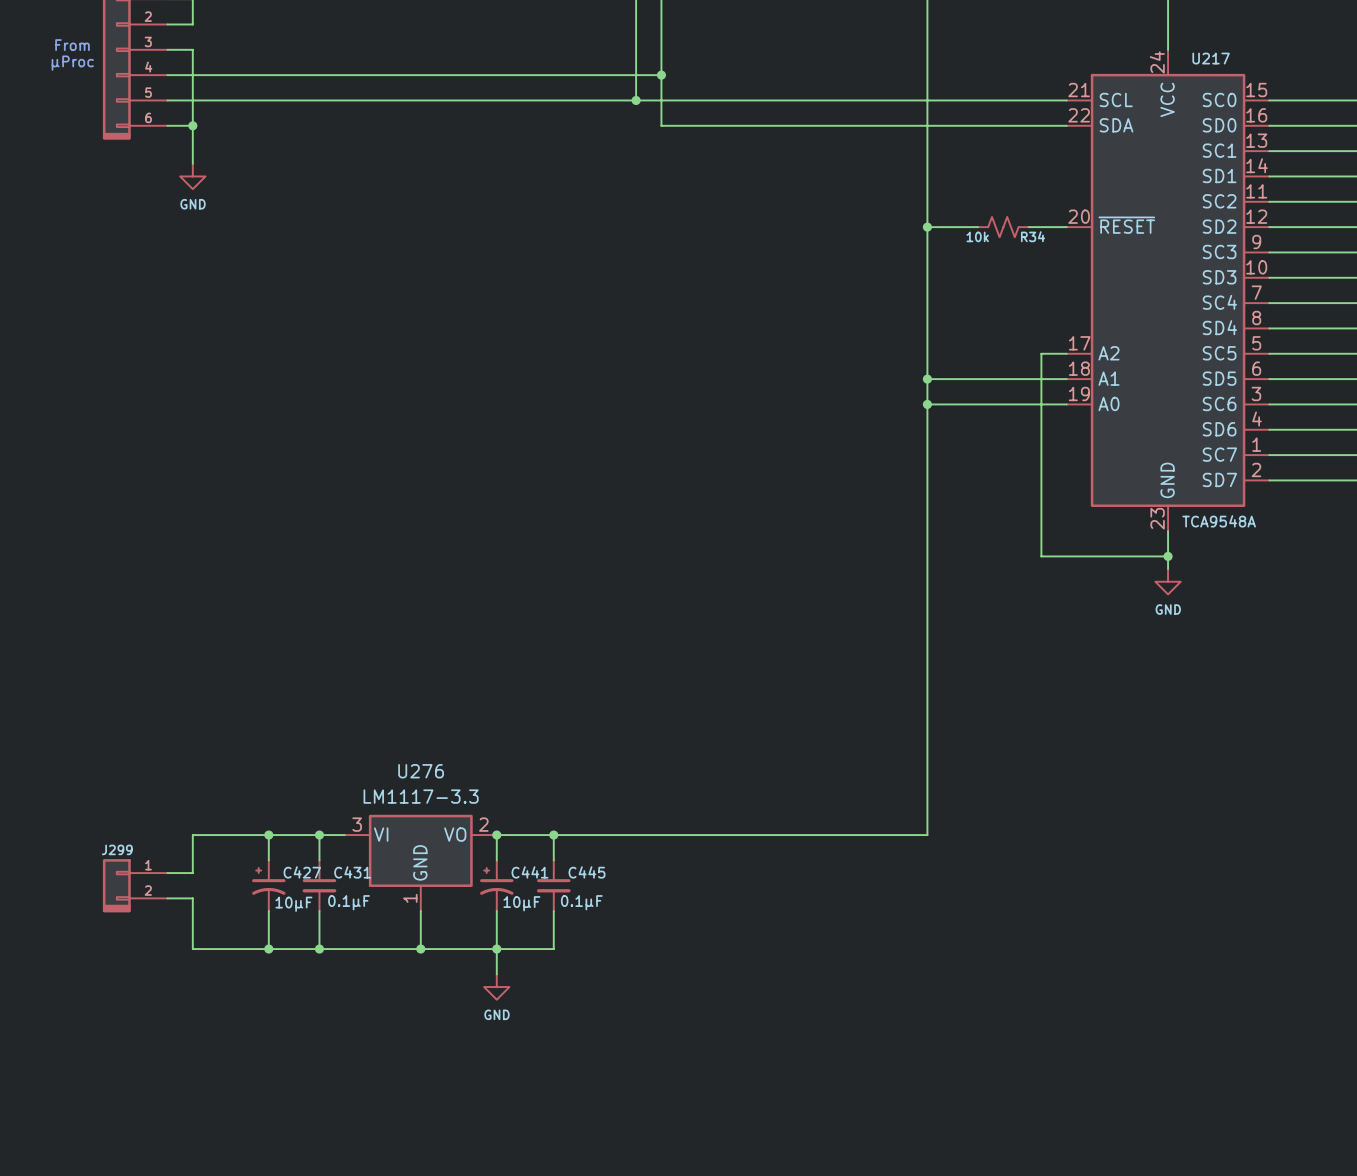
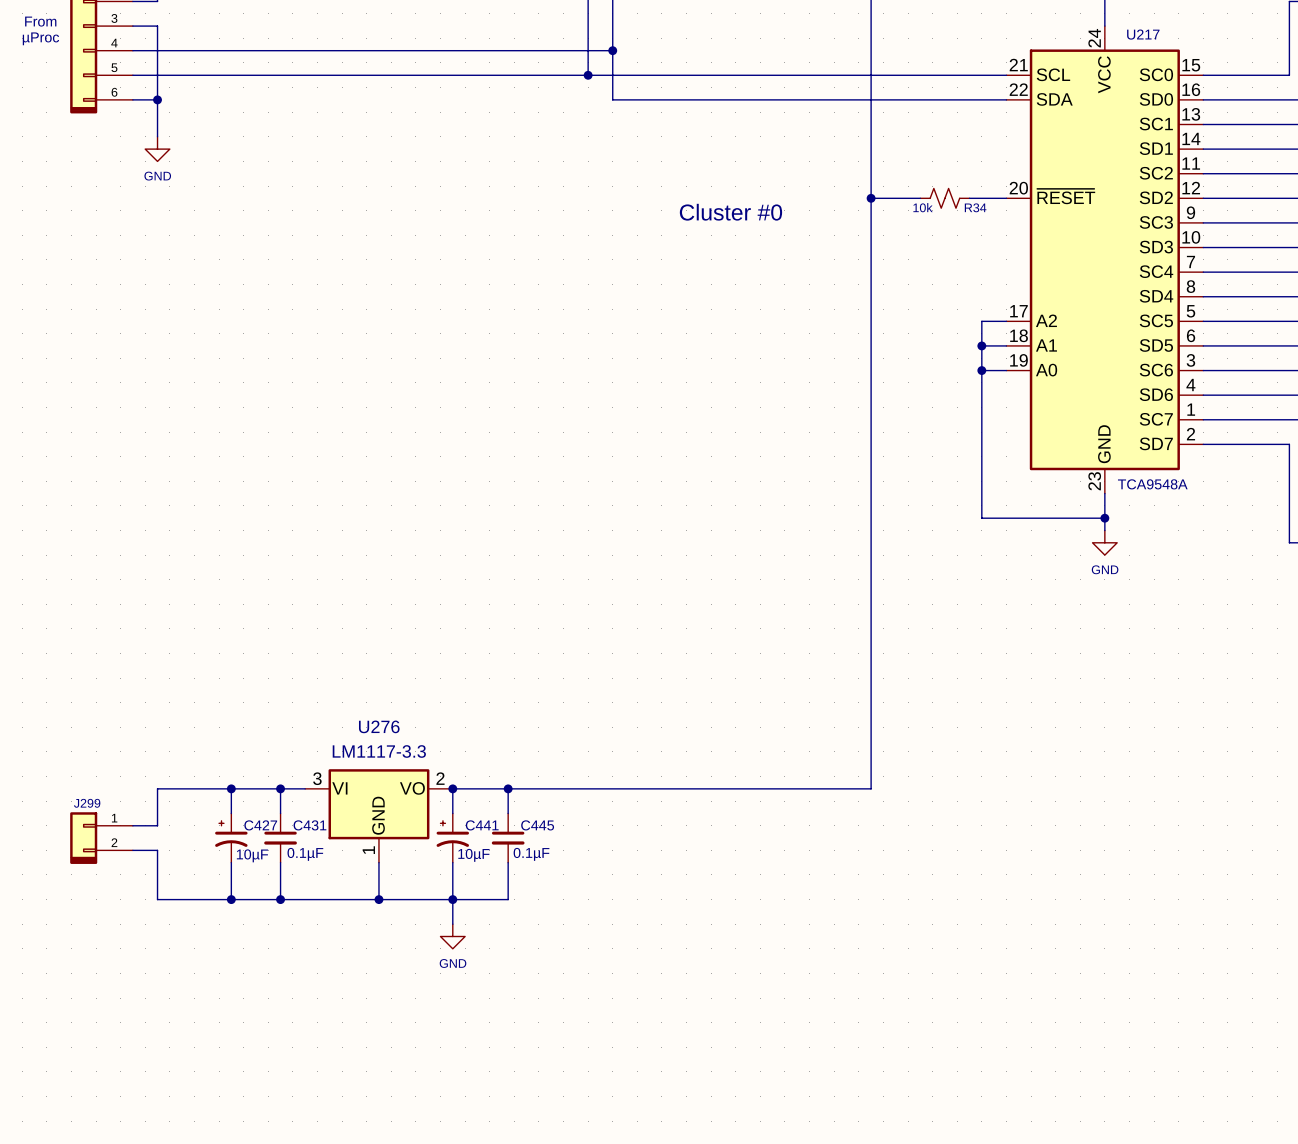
text: none -> Cluster #0 (730, 212)
wire: (927, 379) (1041, 379) -> none
junction: (927, 379) -> none
junction: none -> (981, 345)
wire: (927, 404) (1041, 404) -> none
junction: (927, 404) -> none
junction: none -> (981, 370)

